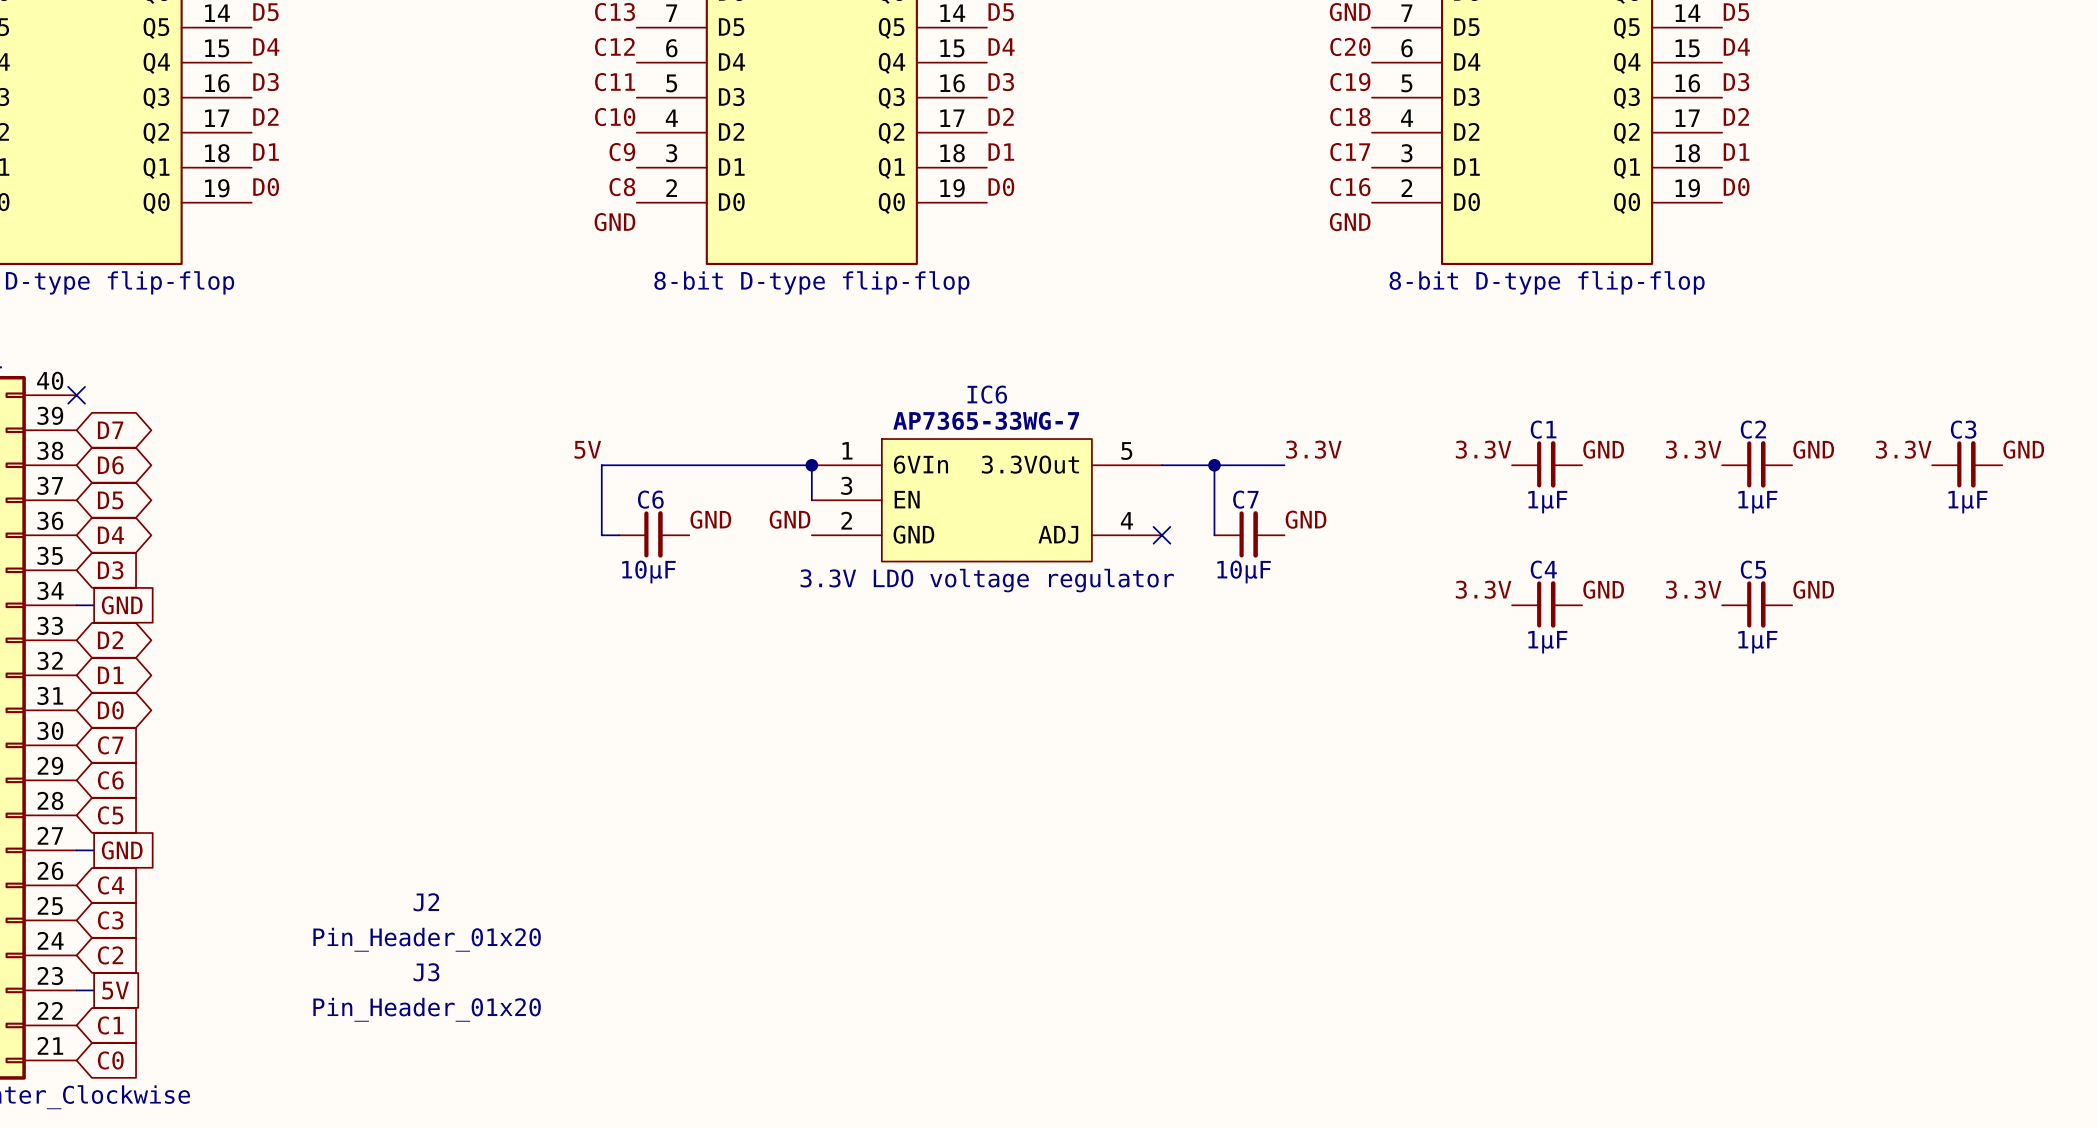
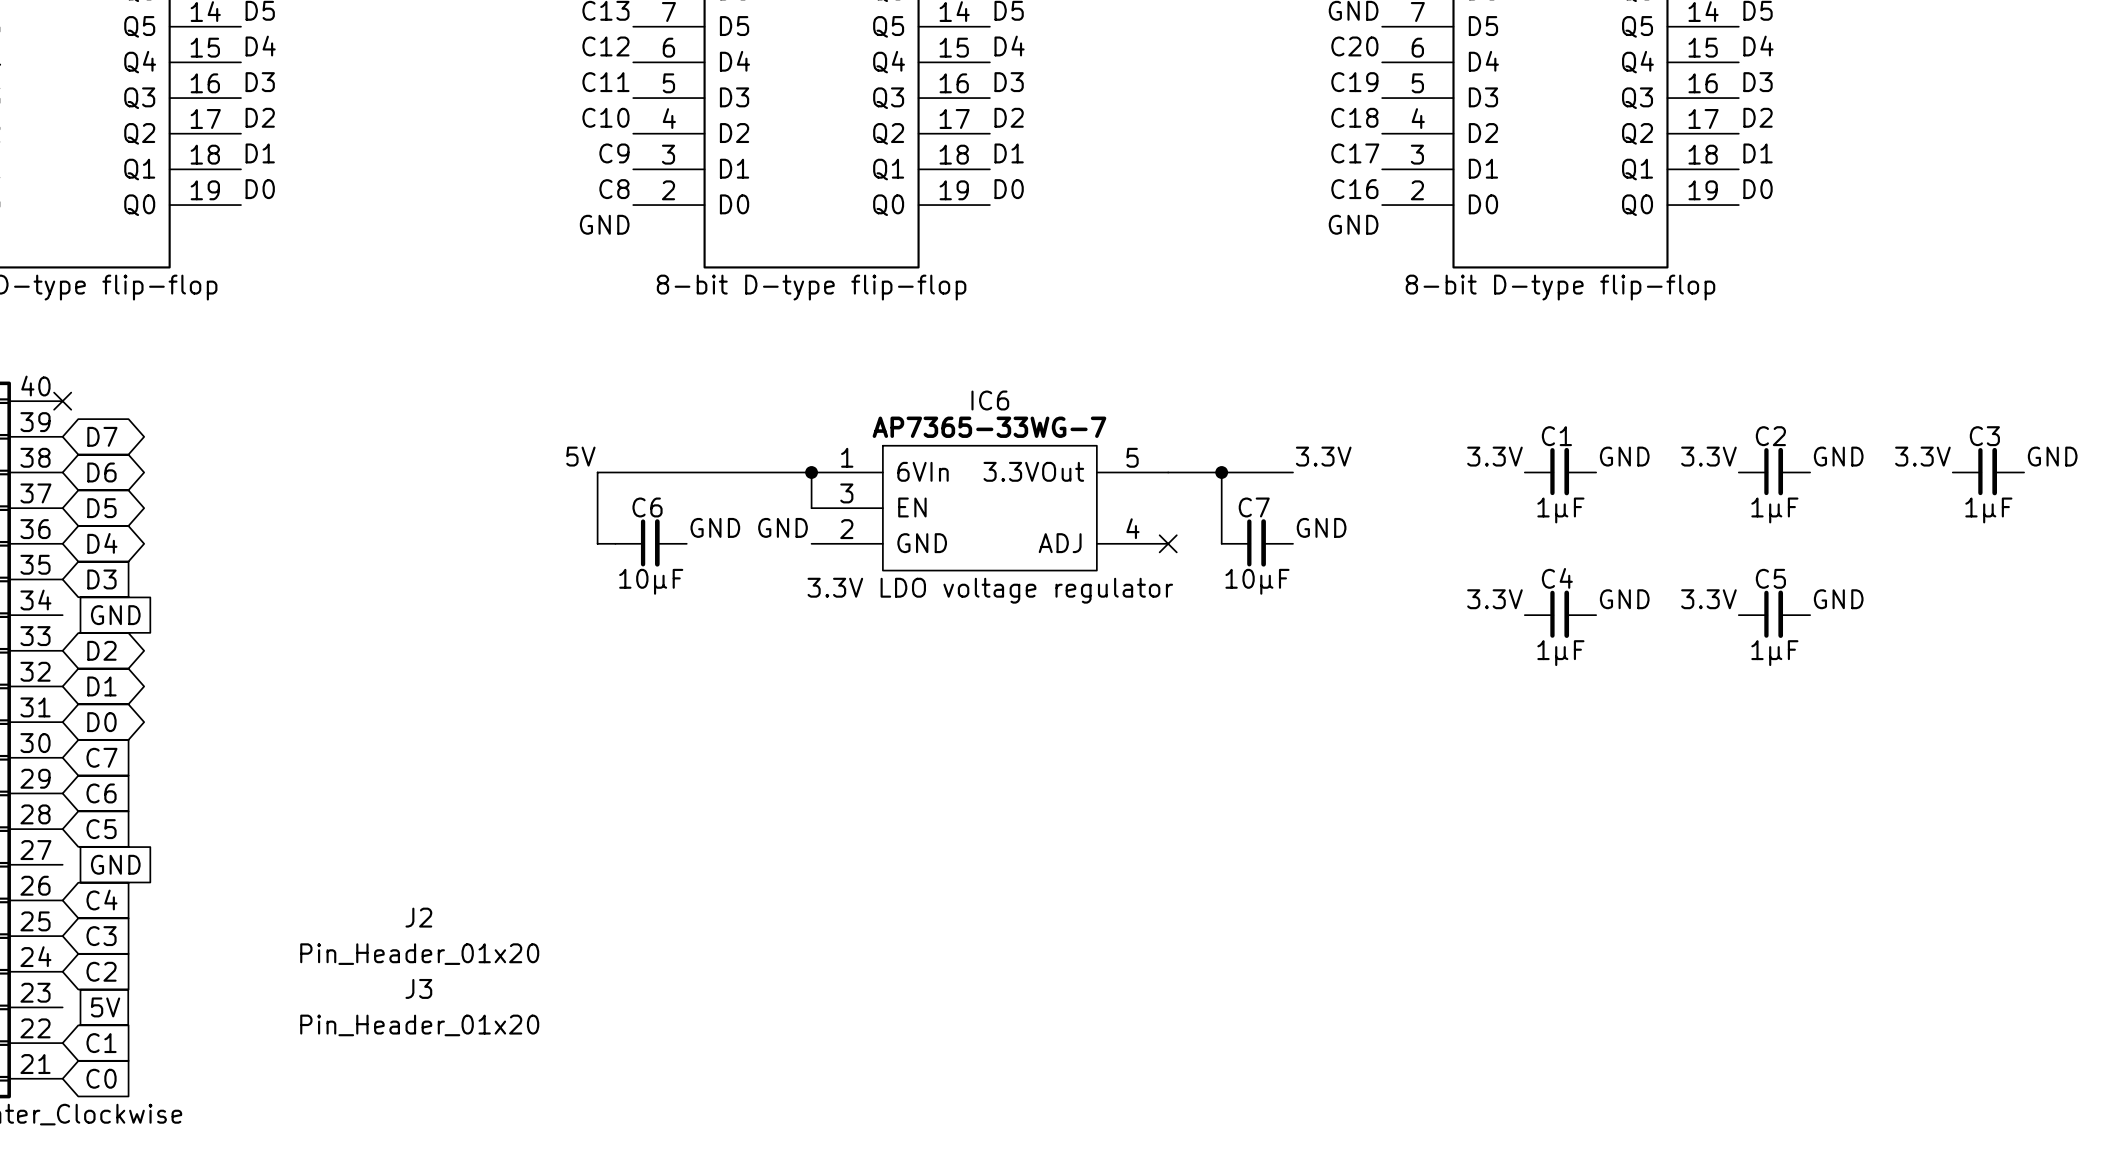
wire: (76, 605) (94, 605) -> none
wire: (76, 850) (94, 850) -> none
wire: (76, 990) (94, 990) -> none

